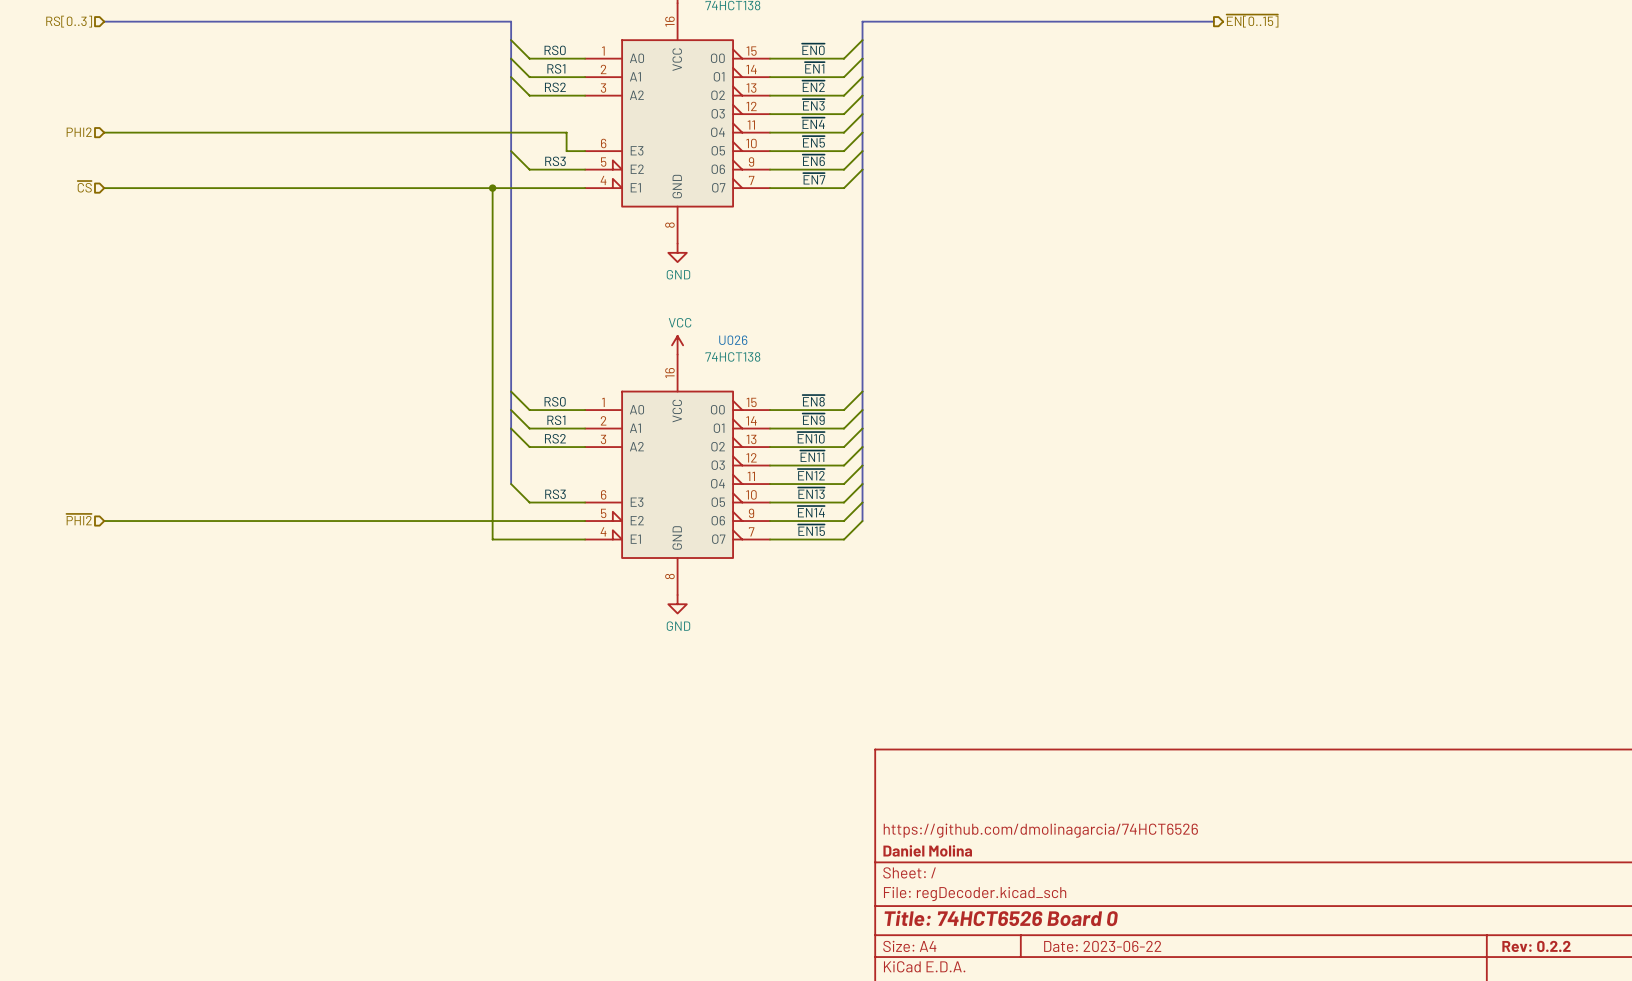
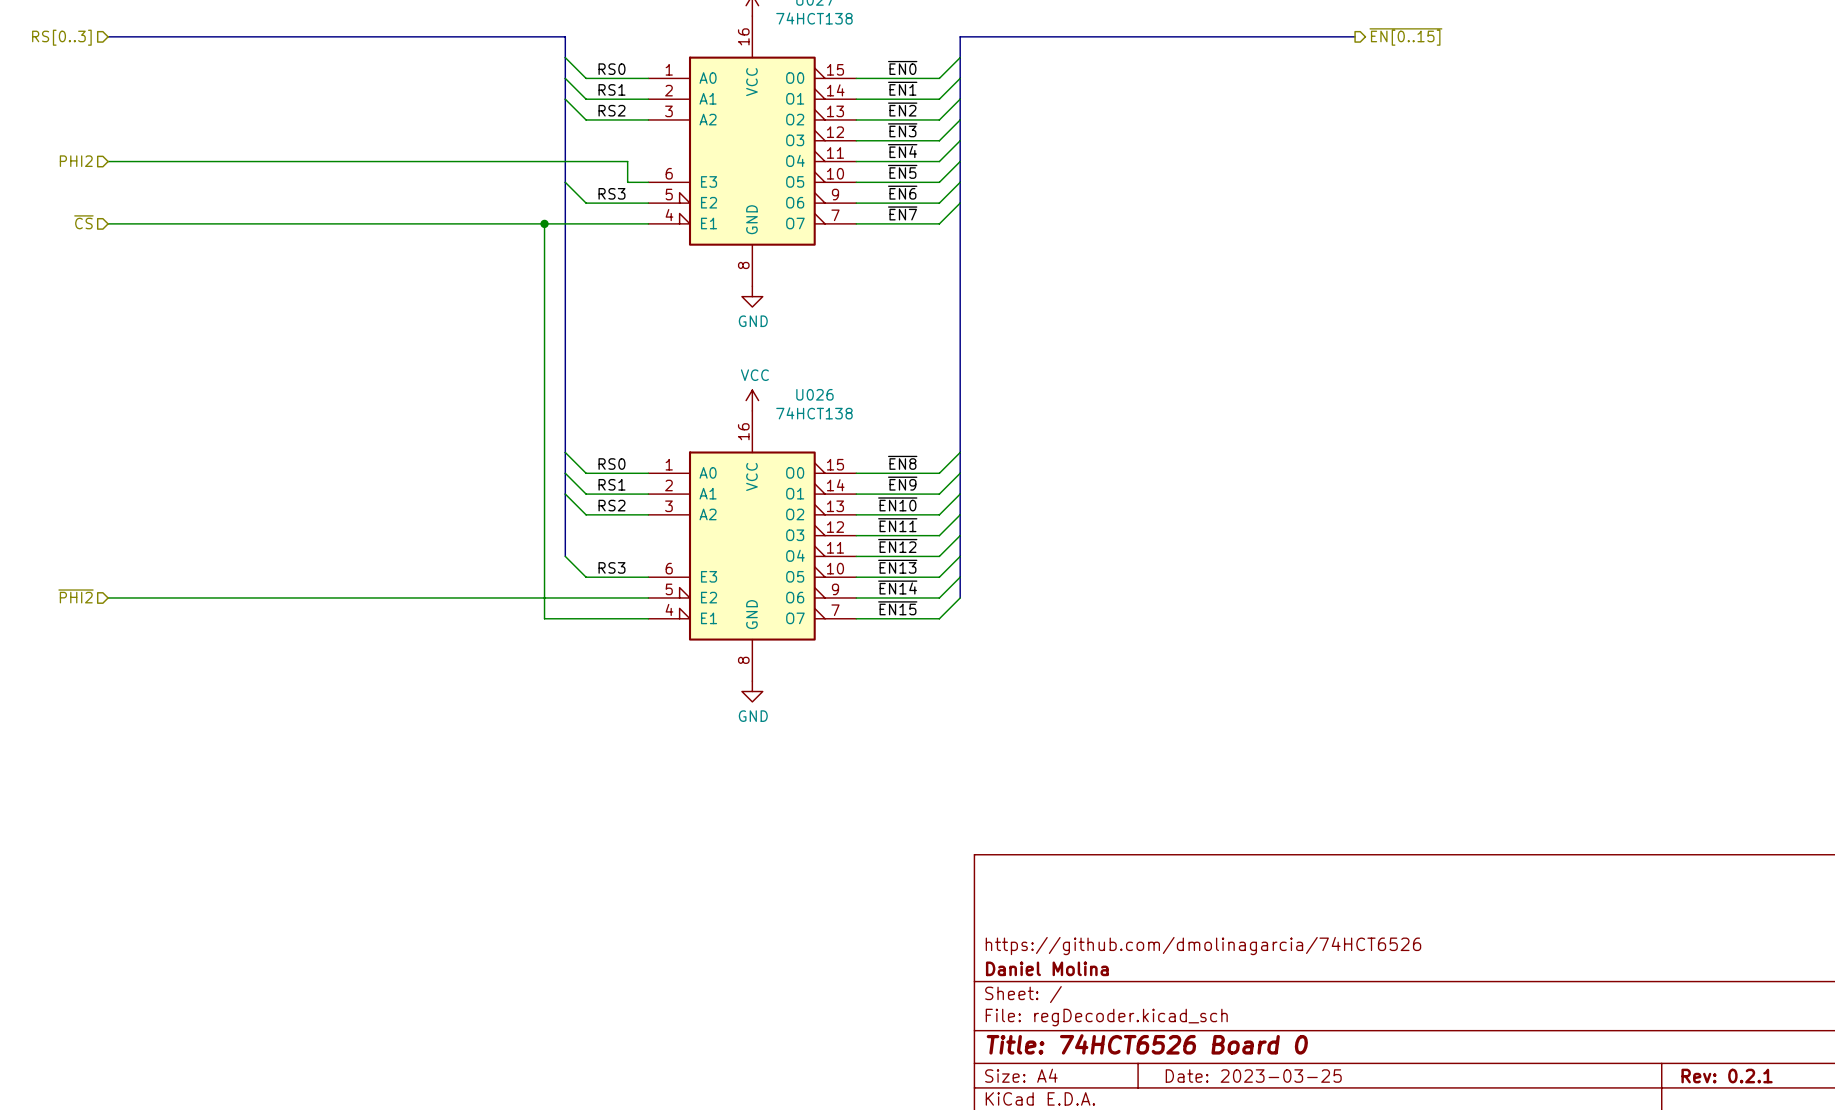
title block: Date: 2023-06-22 (1102, 946) -> Date: 2023-03-25 (1253, 1076)
title block: Rev: 0.2.2 (1536, 946) -> Rev: 0.2.1 (1727, 1076)

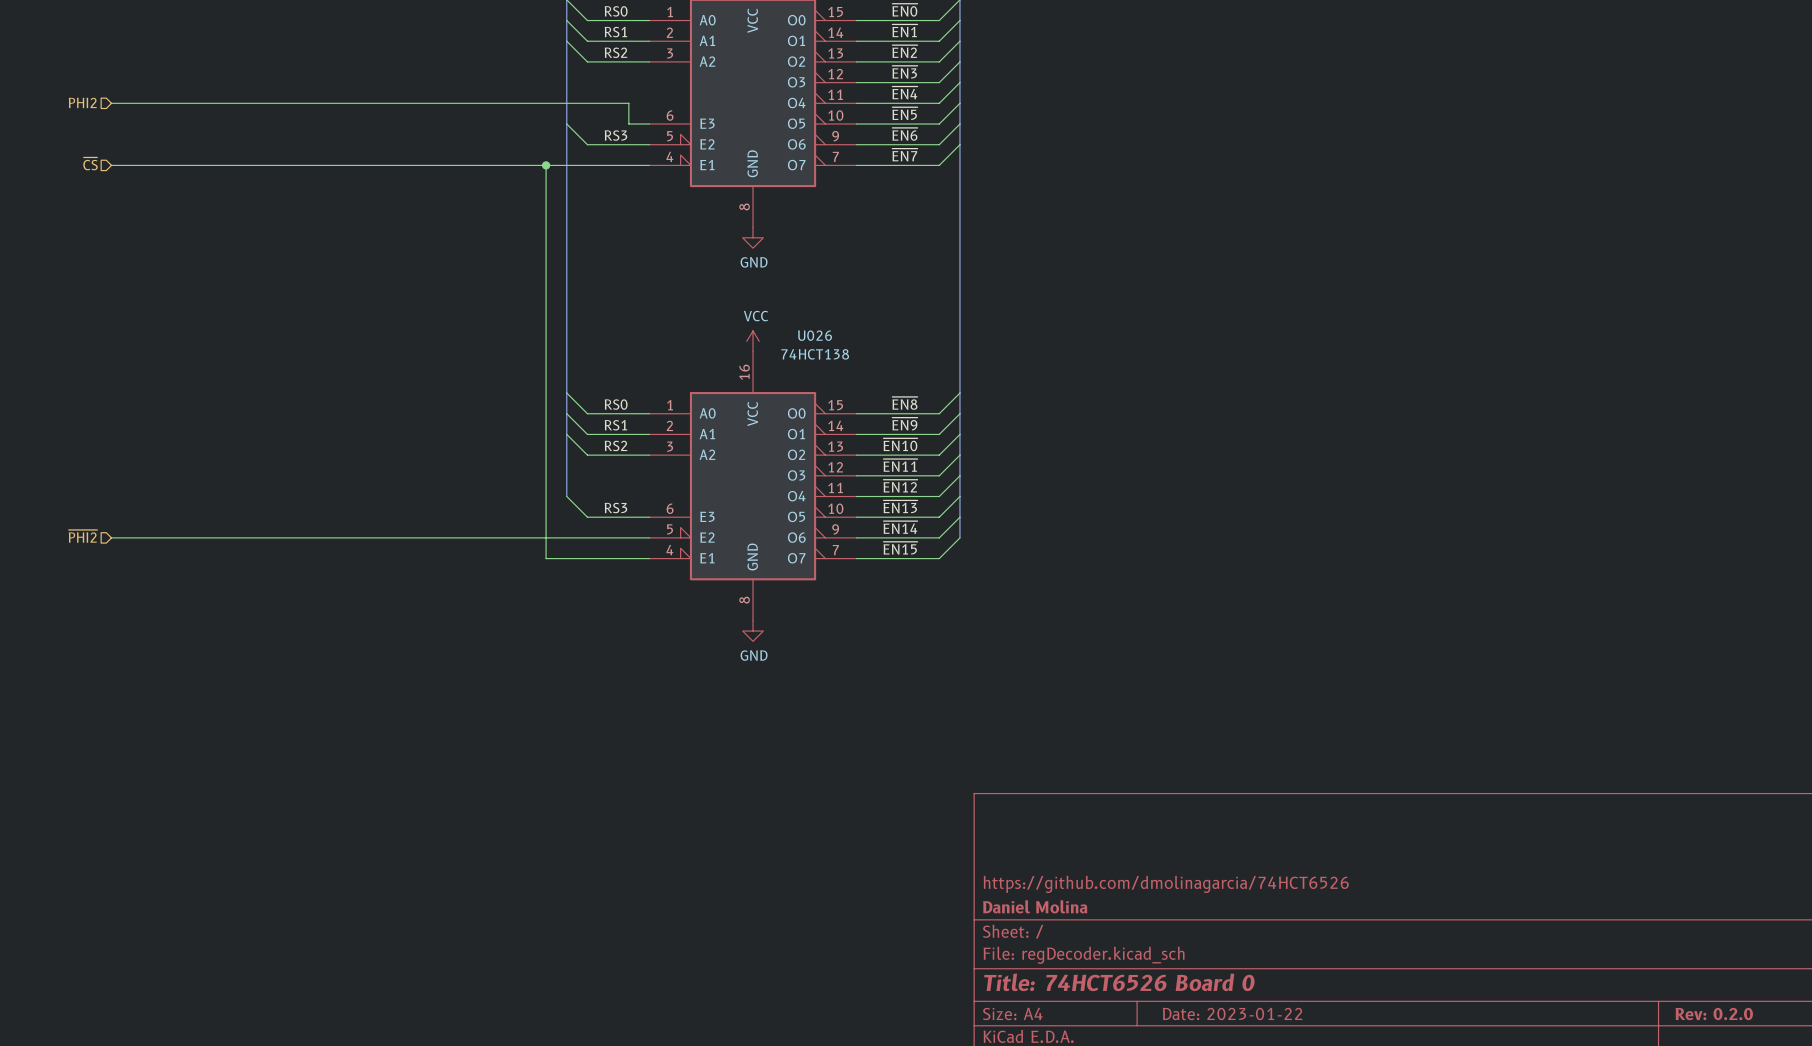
title block: Date: 2023-03-25 (1253, 1076) -> Date: 2023-01-22 (1232, 1013)
title block: Rev: 0.2.1 (1727, 1076) -> Rev: 0.2.0 (1714, 1014)

